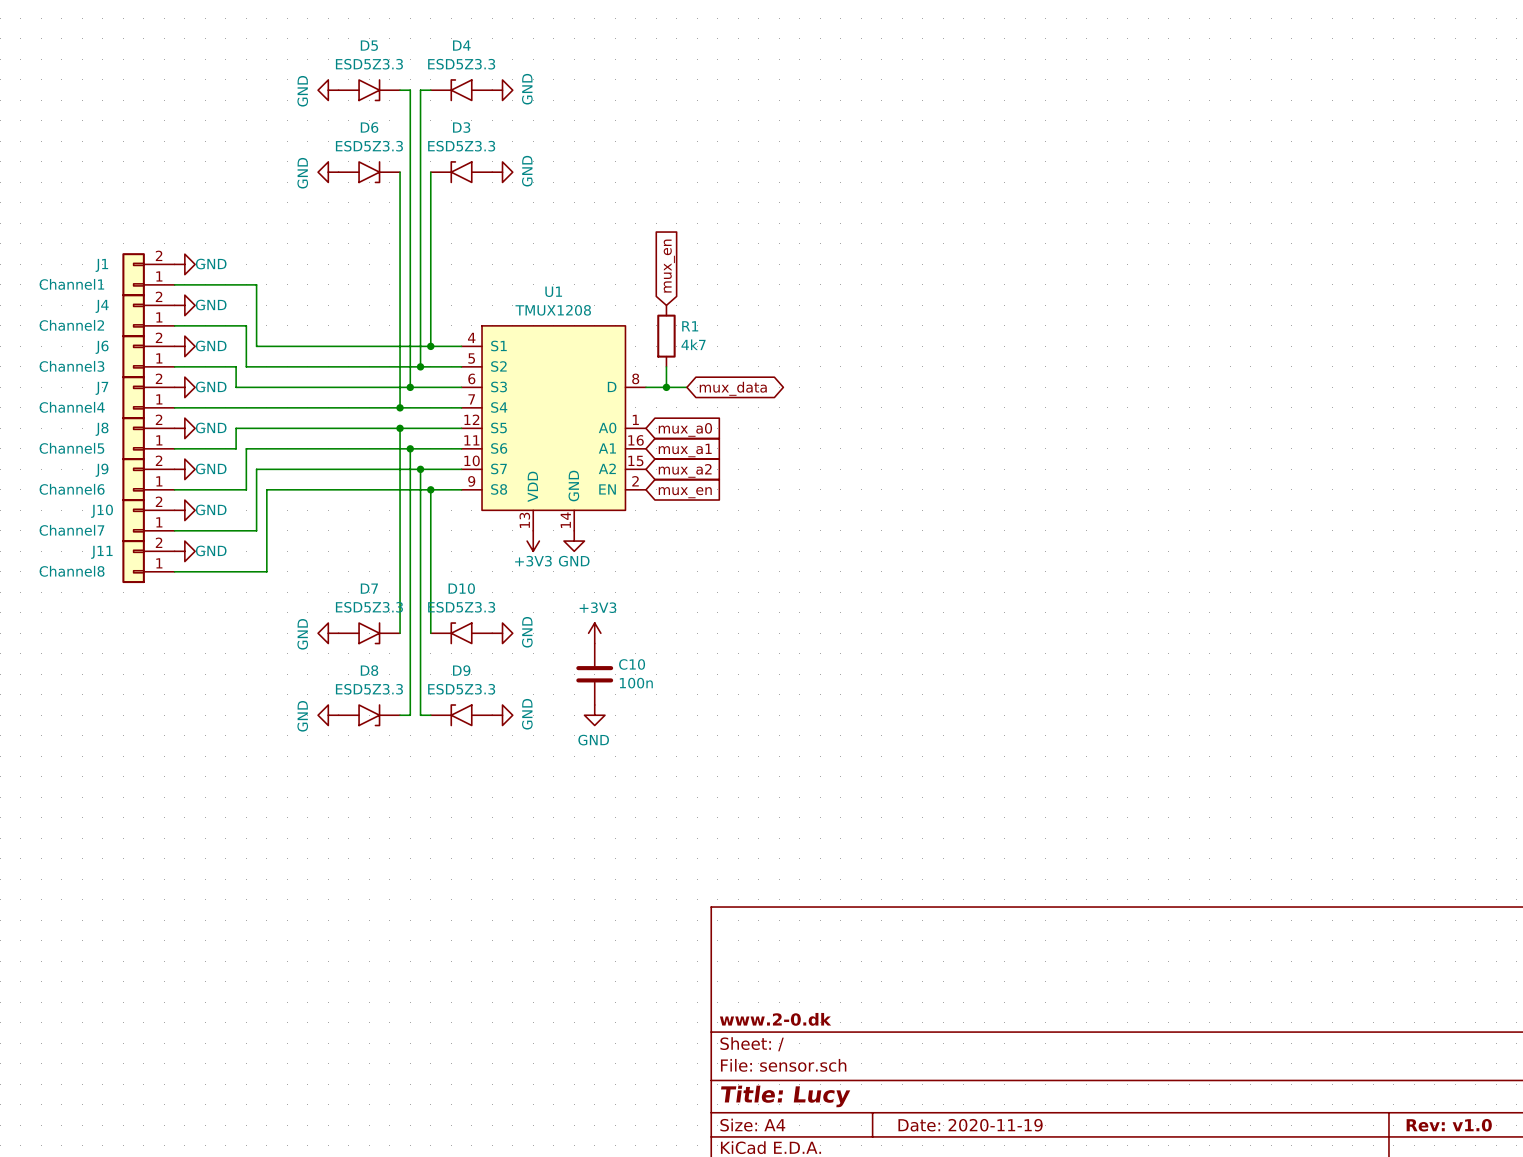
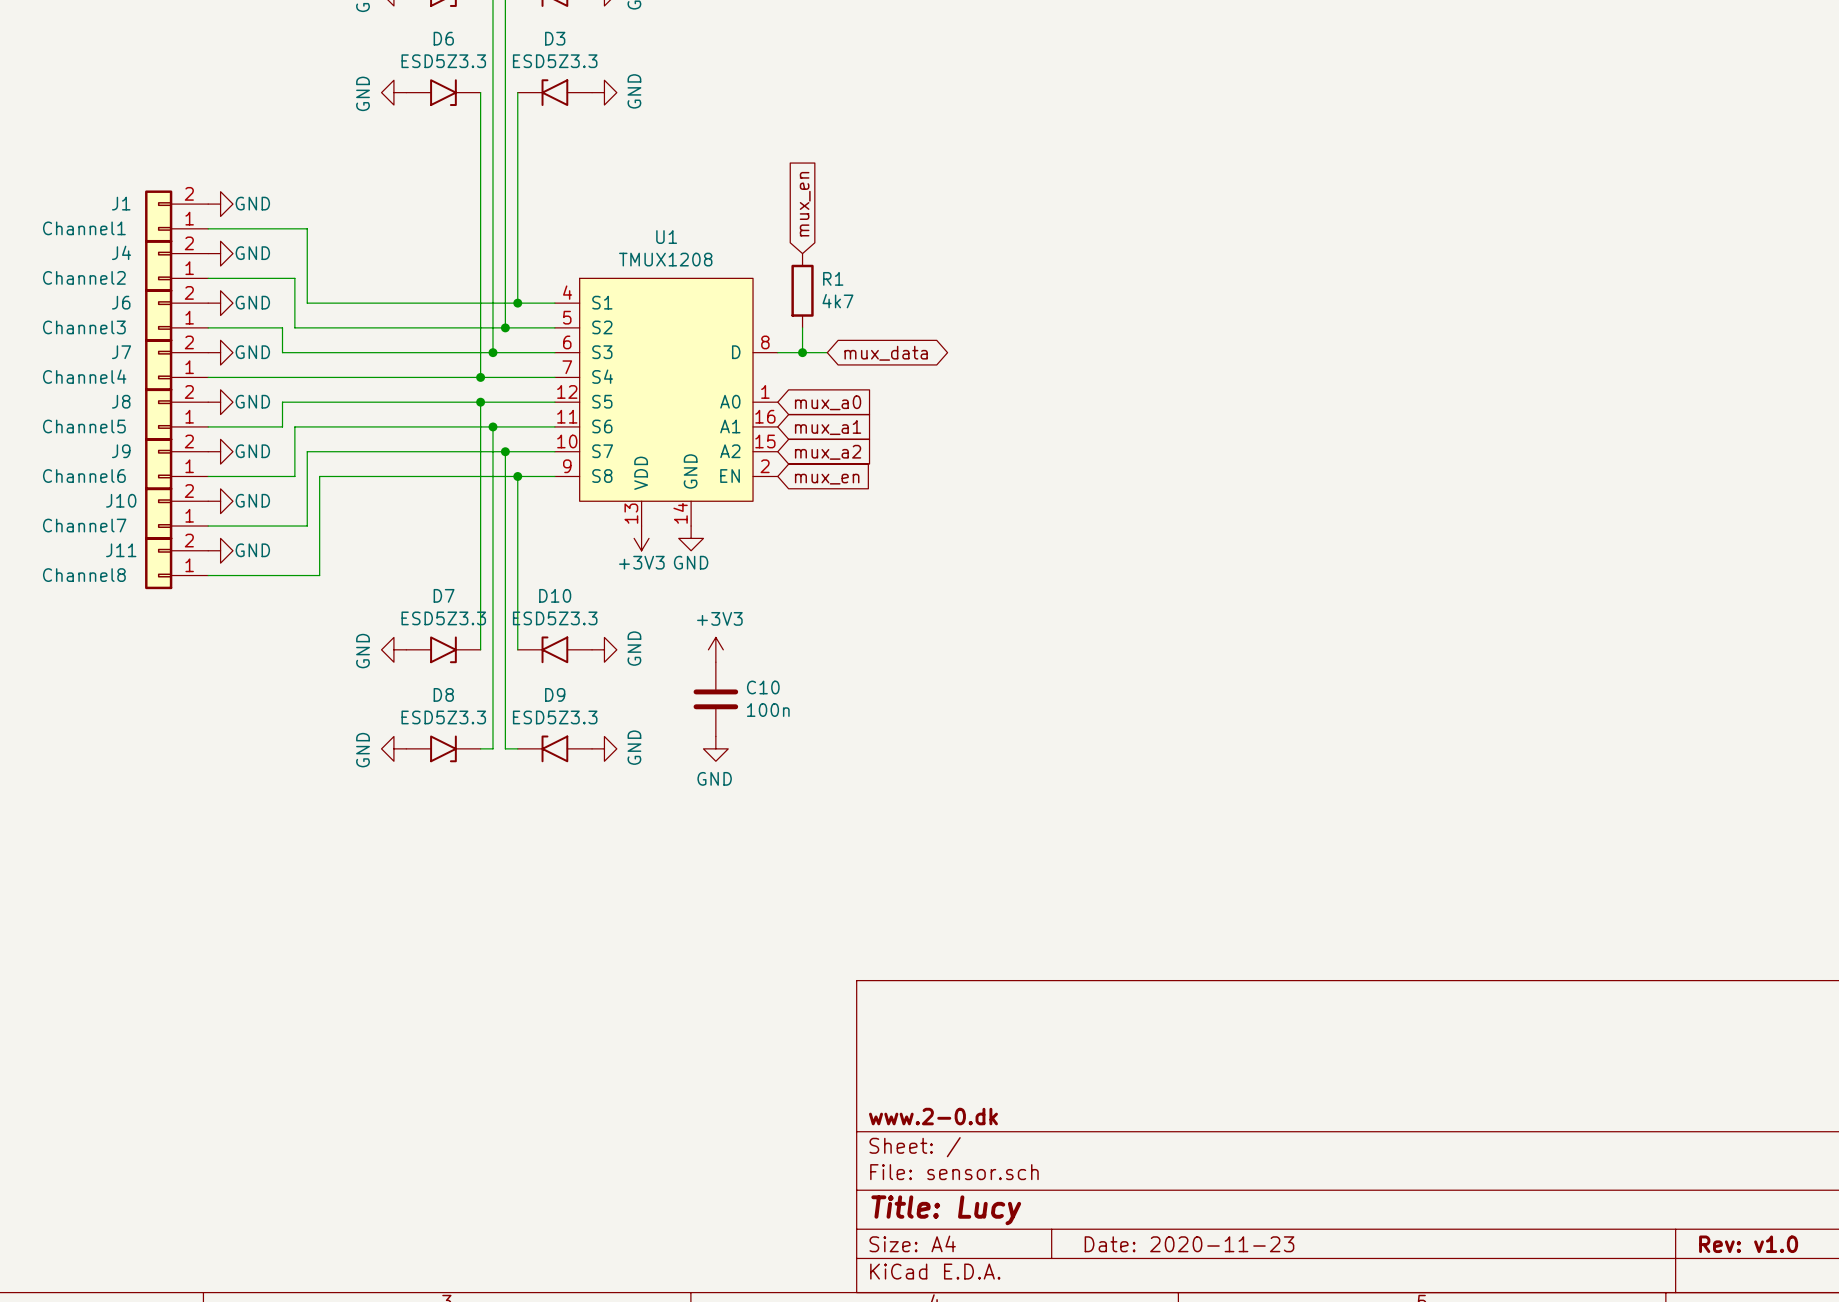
title block: Date: 2020-11-19 (970, 1125) -> Date: 2020-11-23 (1189, 1244)

